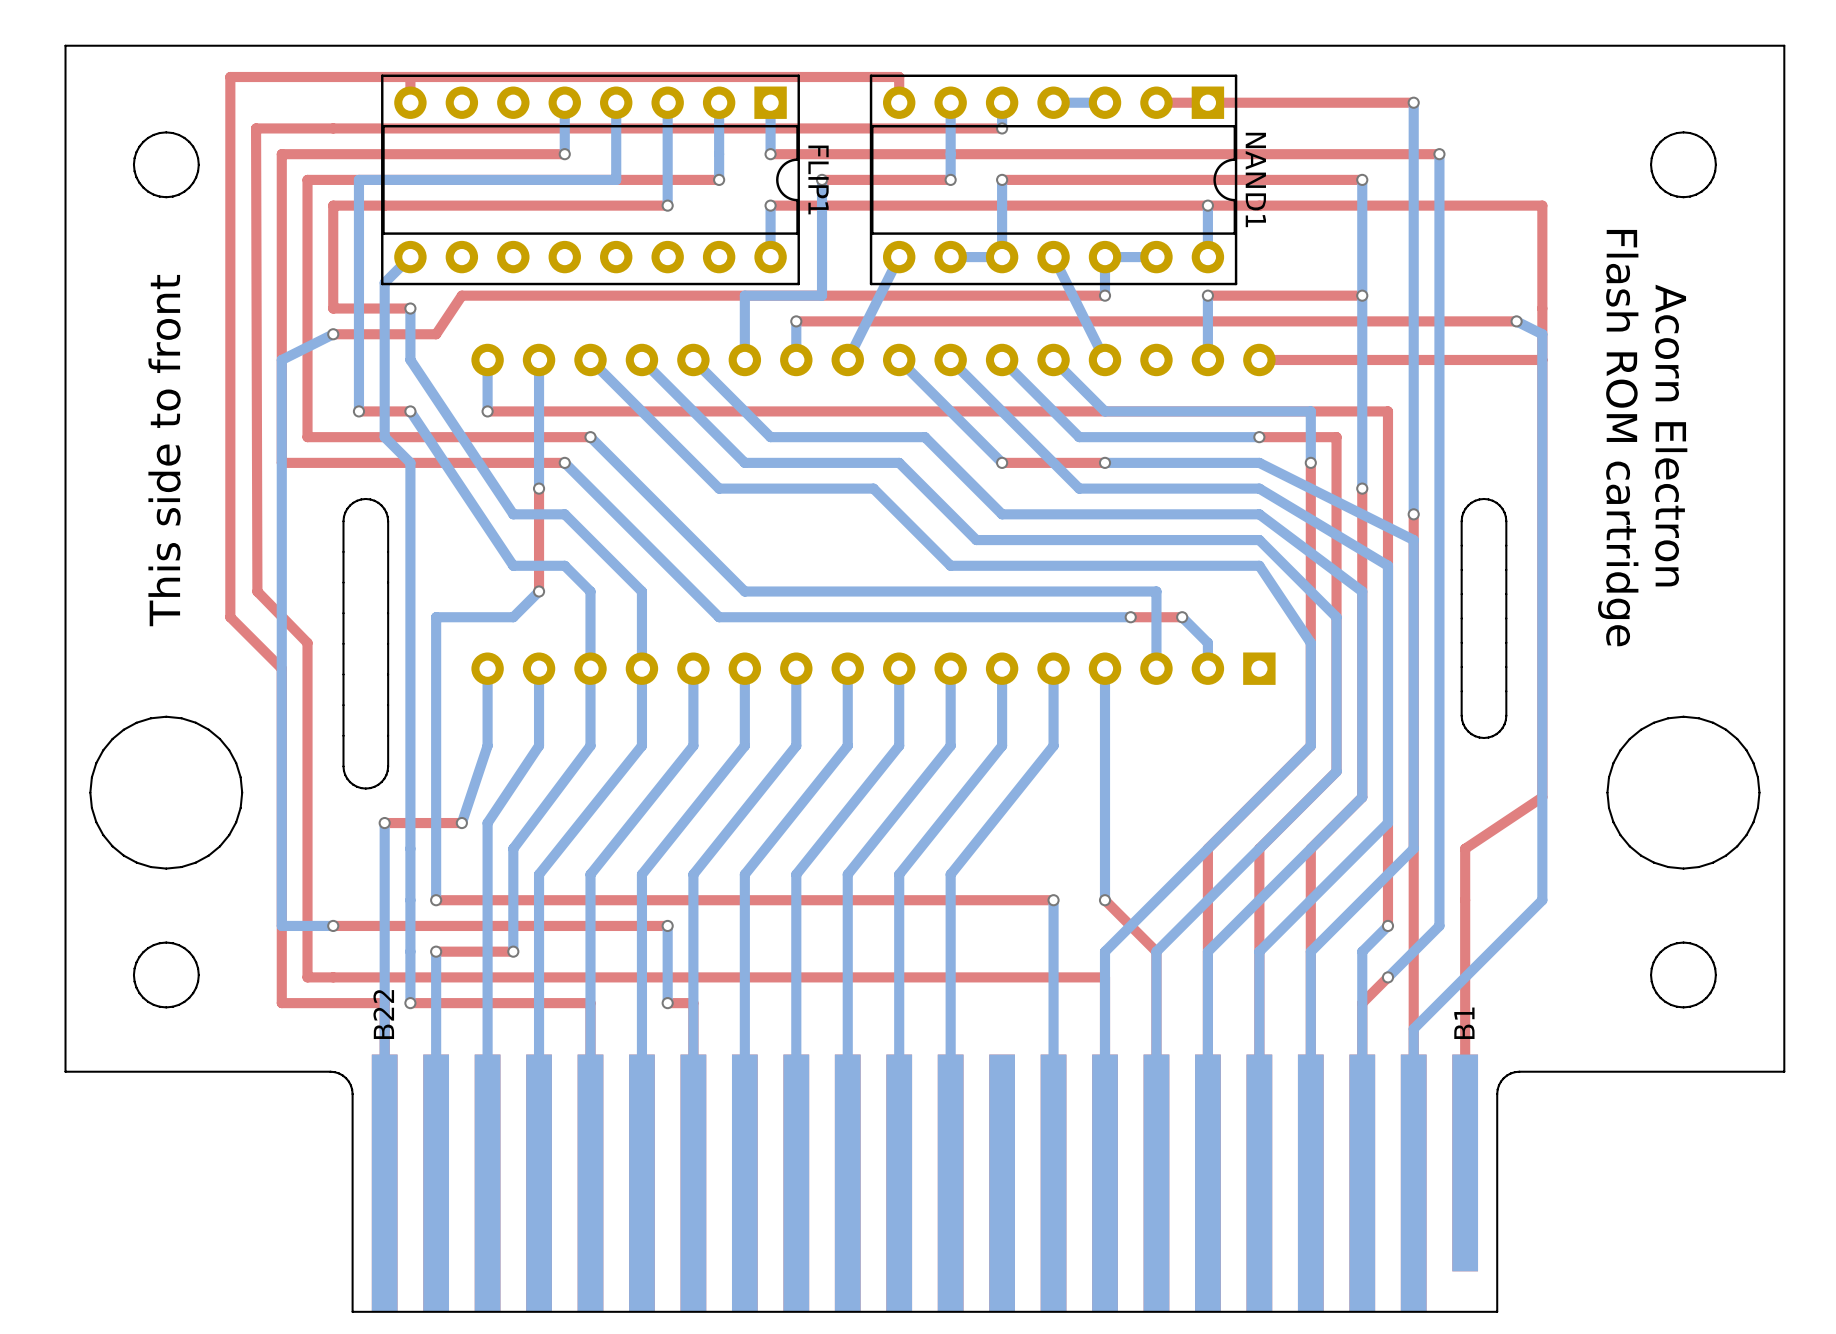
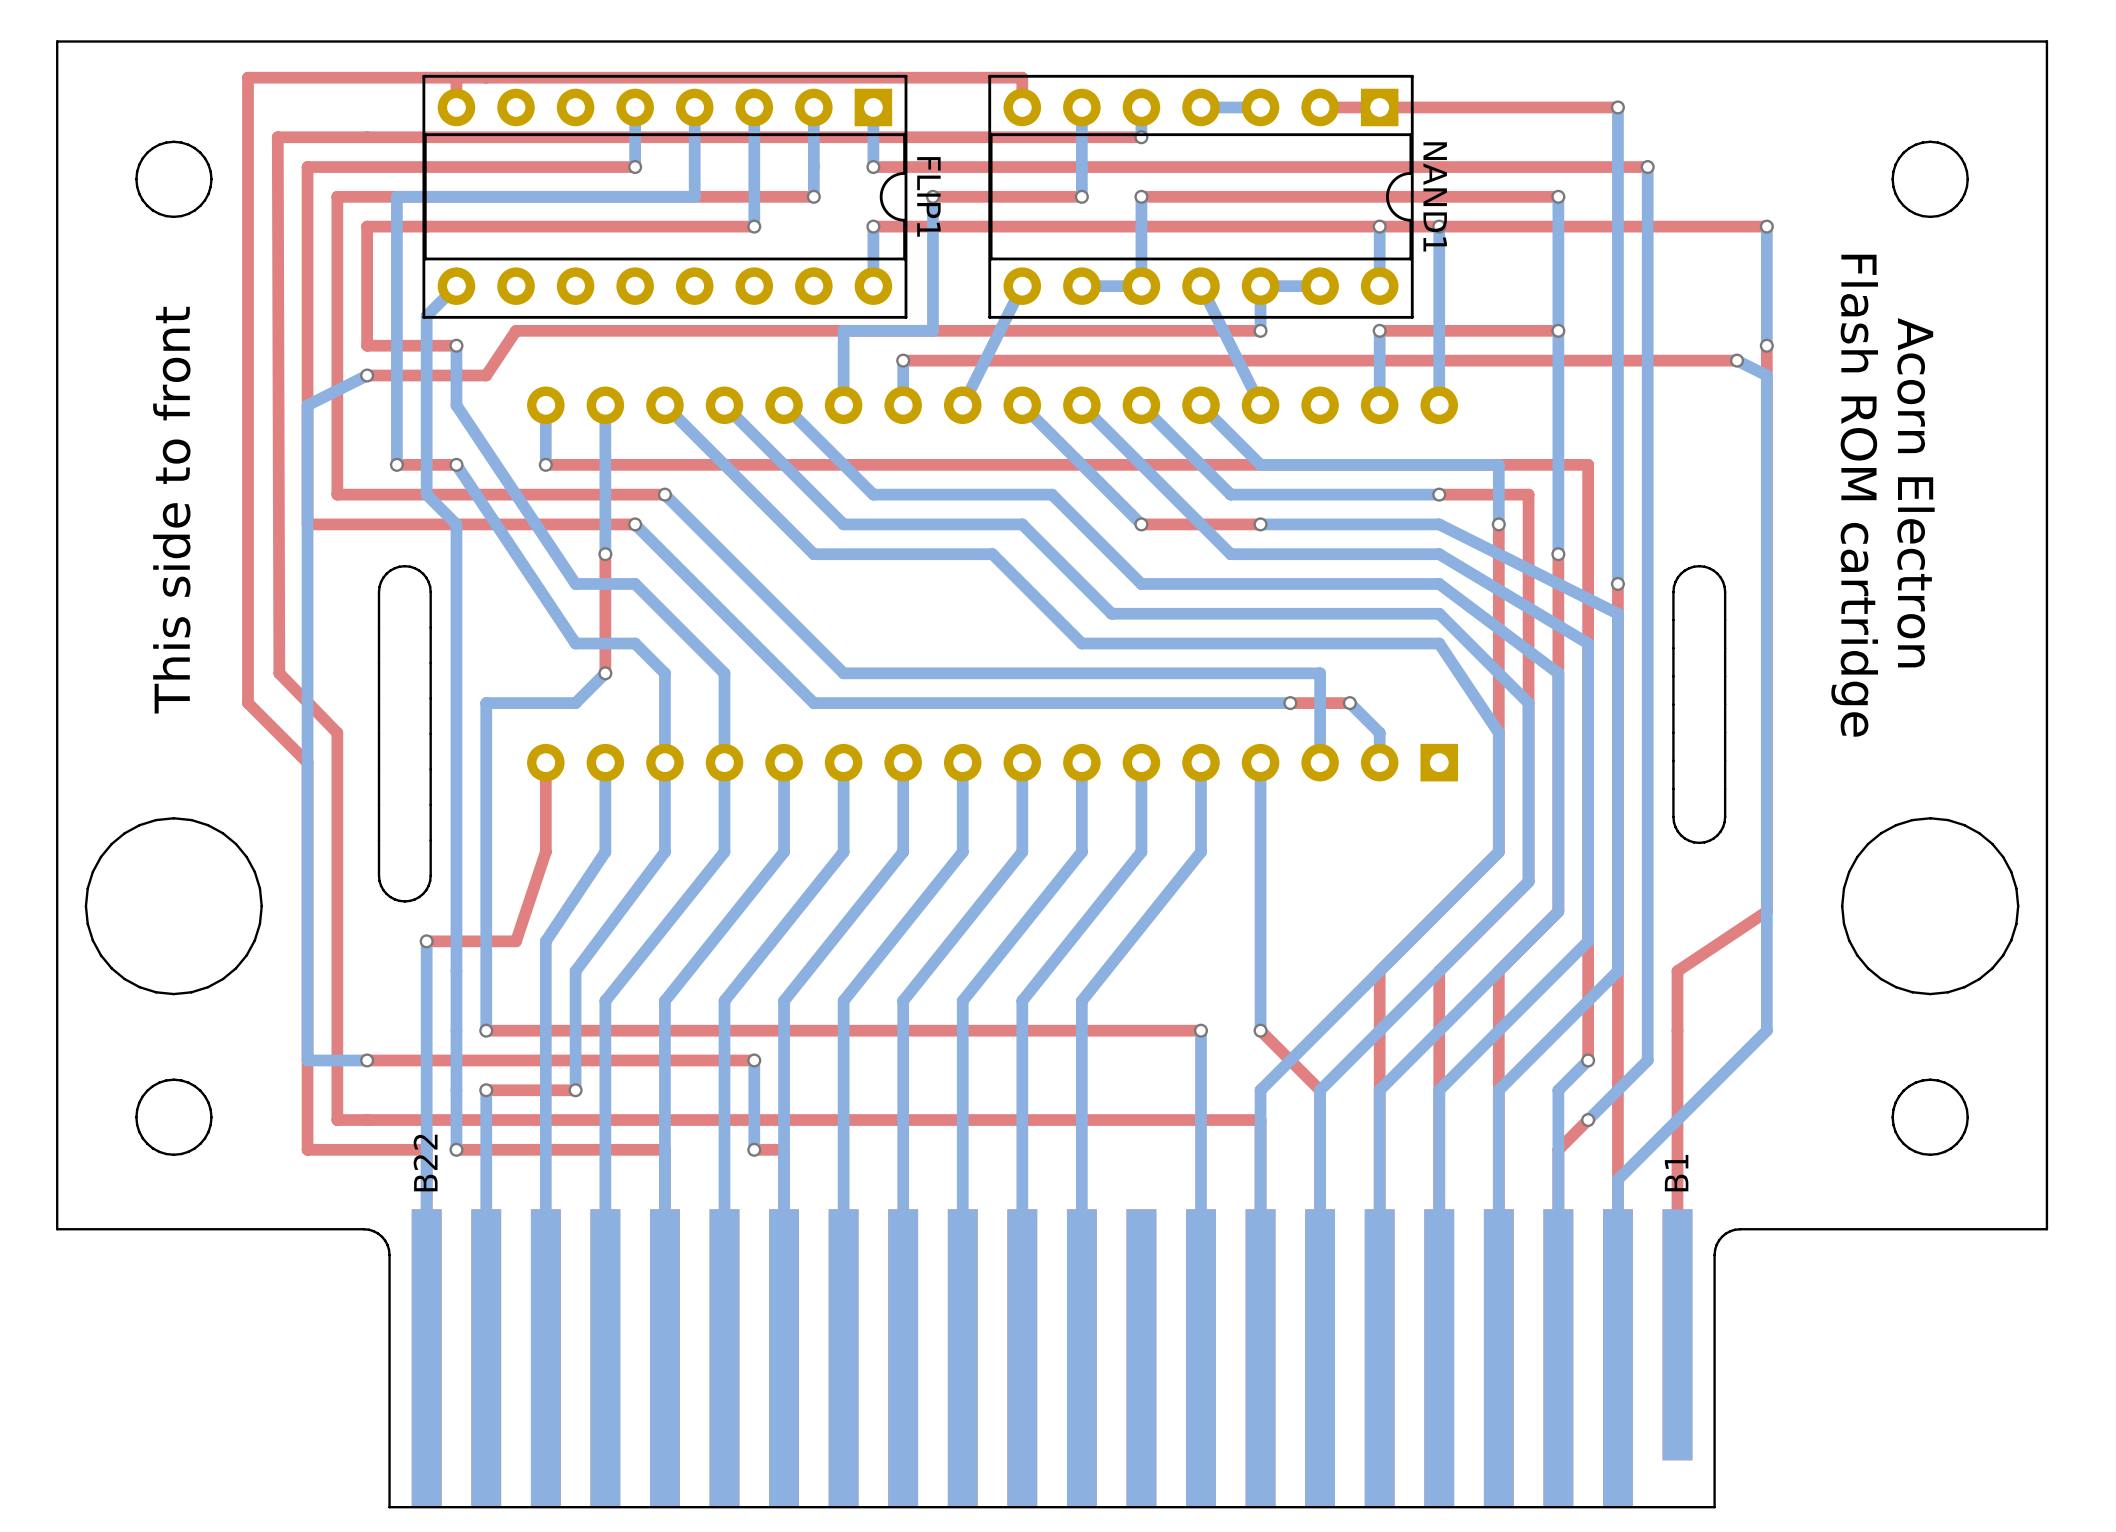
bottom track: none -> (1439, 226) (1439, 405)
via: none -> (1439, 226)
top track: (1542, 205) (1542, 308) -> none
bottom track: none -> (1766, 226) (1766, 345)
via: none -> (1766, 226)
via: none -> (1766, 345)
top track: (1542, 359) (1259, 359) -> none
top track: none -> (545, 762) (545, 852) (516, 941)
bottom track: (487, 668) (487, 745) (461, 823) -> none
via: (461, 823) -> none

